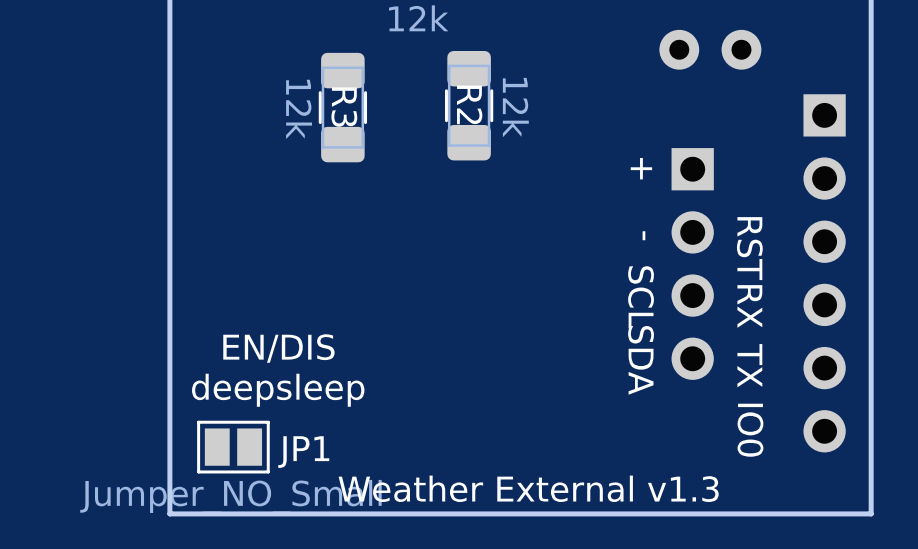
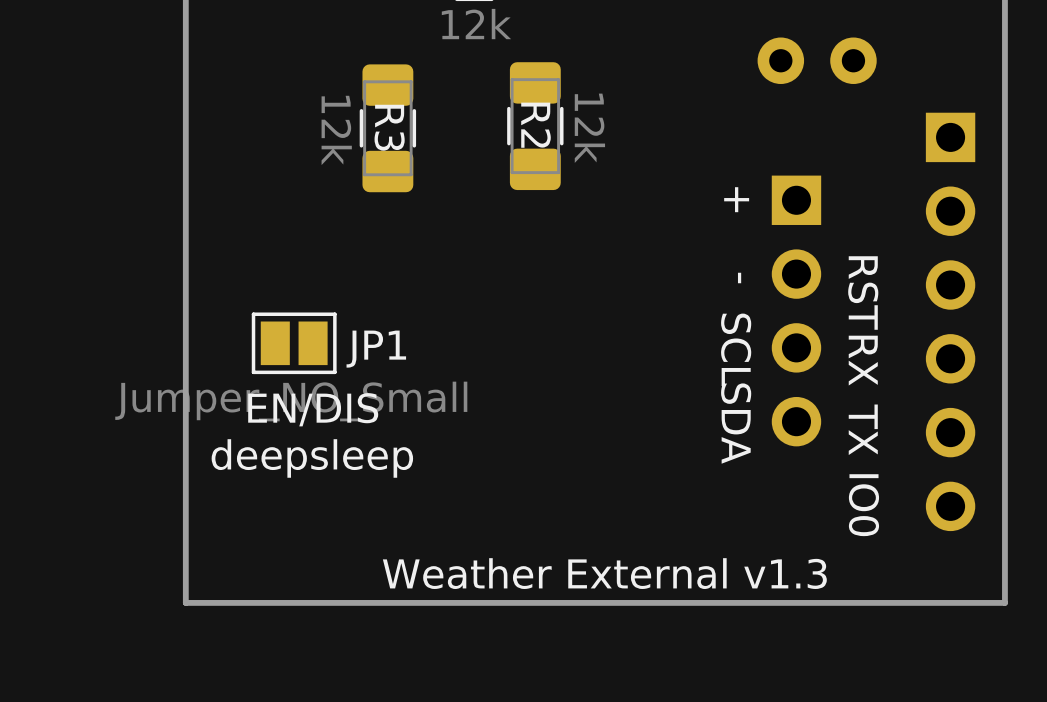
JP1 position: (233, 447) -> (294, 343)

